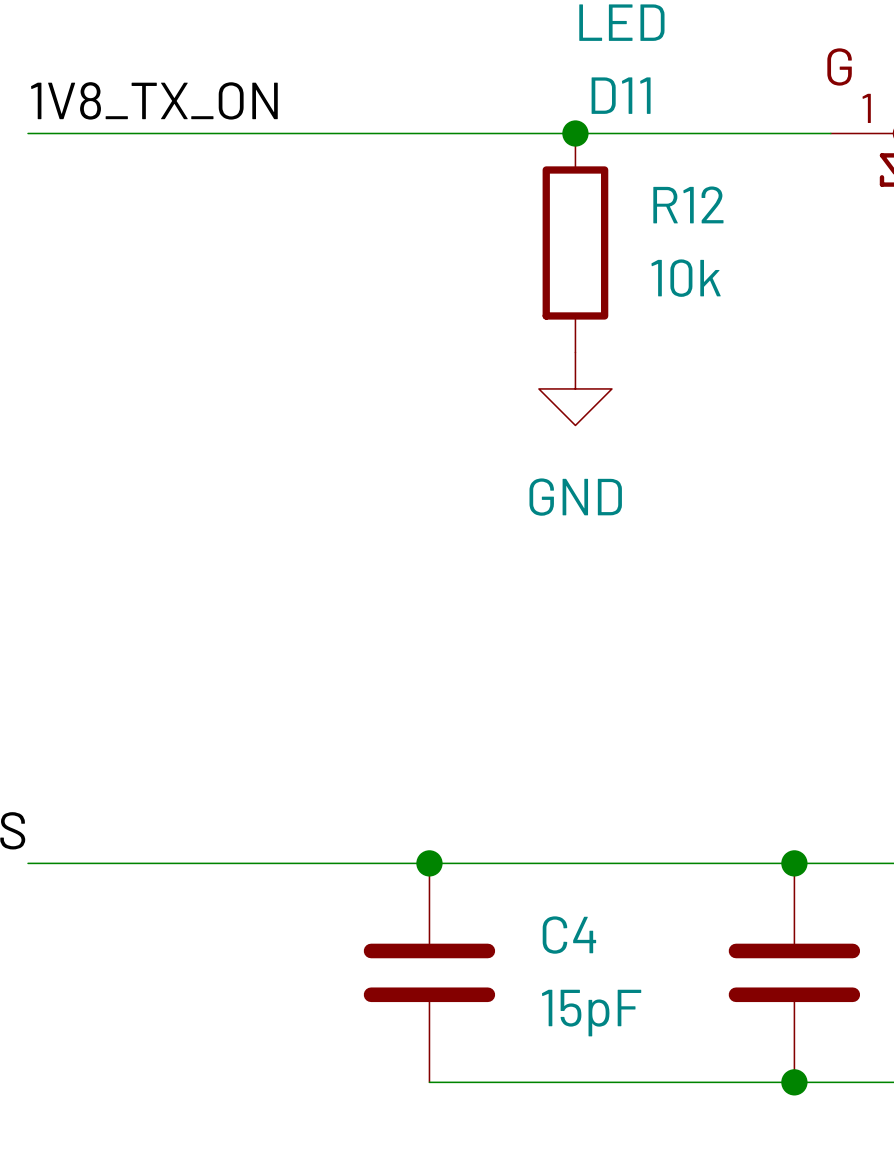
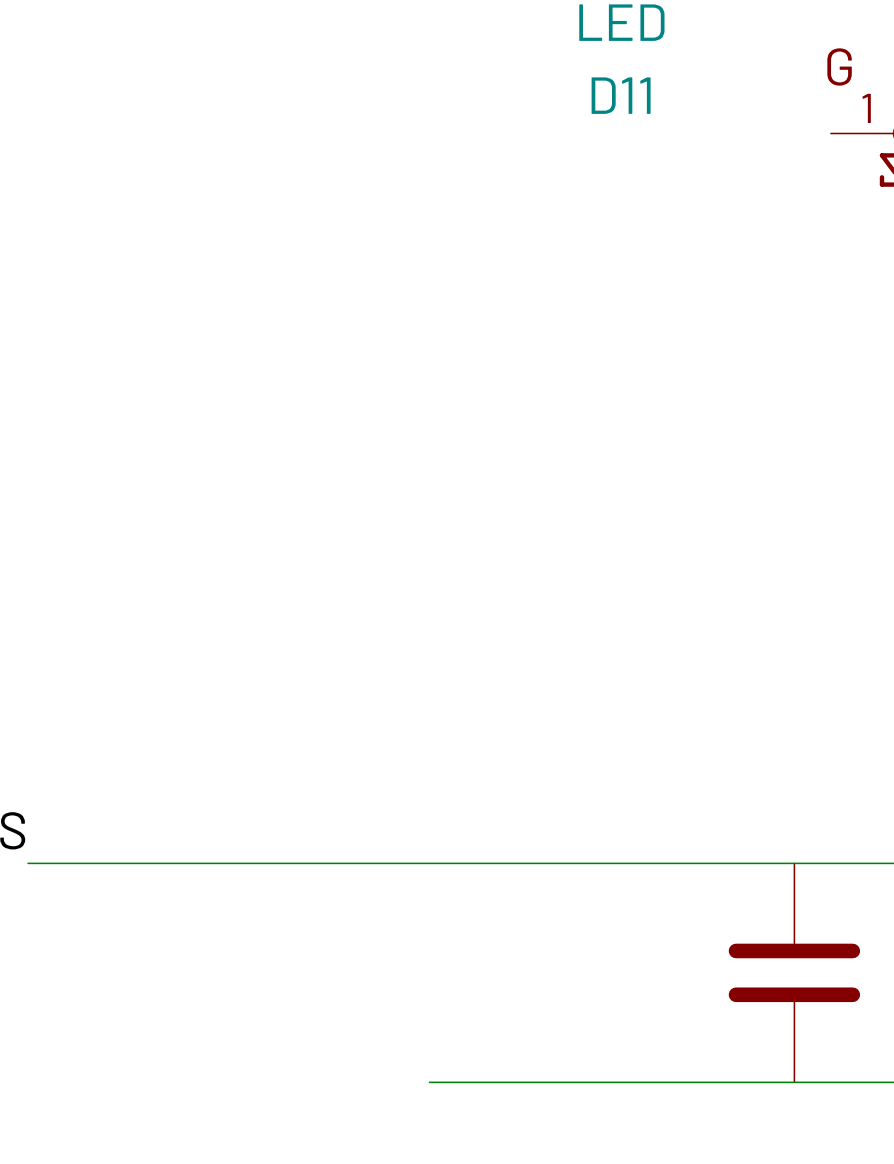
label: 1V8_TX_ON (154, 100) -> none
wire: (28, 133) (830, 133) -> none
junction: (575, 133) -> none
R12: 10k (575, 242) -> none
power symbol: GND (575, 388) -> none
junction: (429, 863) -> none
junction: (794, 863) -> none
C4: 15pF (429, 972) -> none
junction: (794, 1082) -> none

